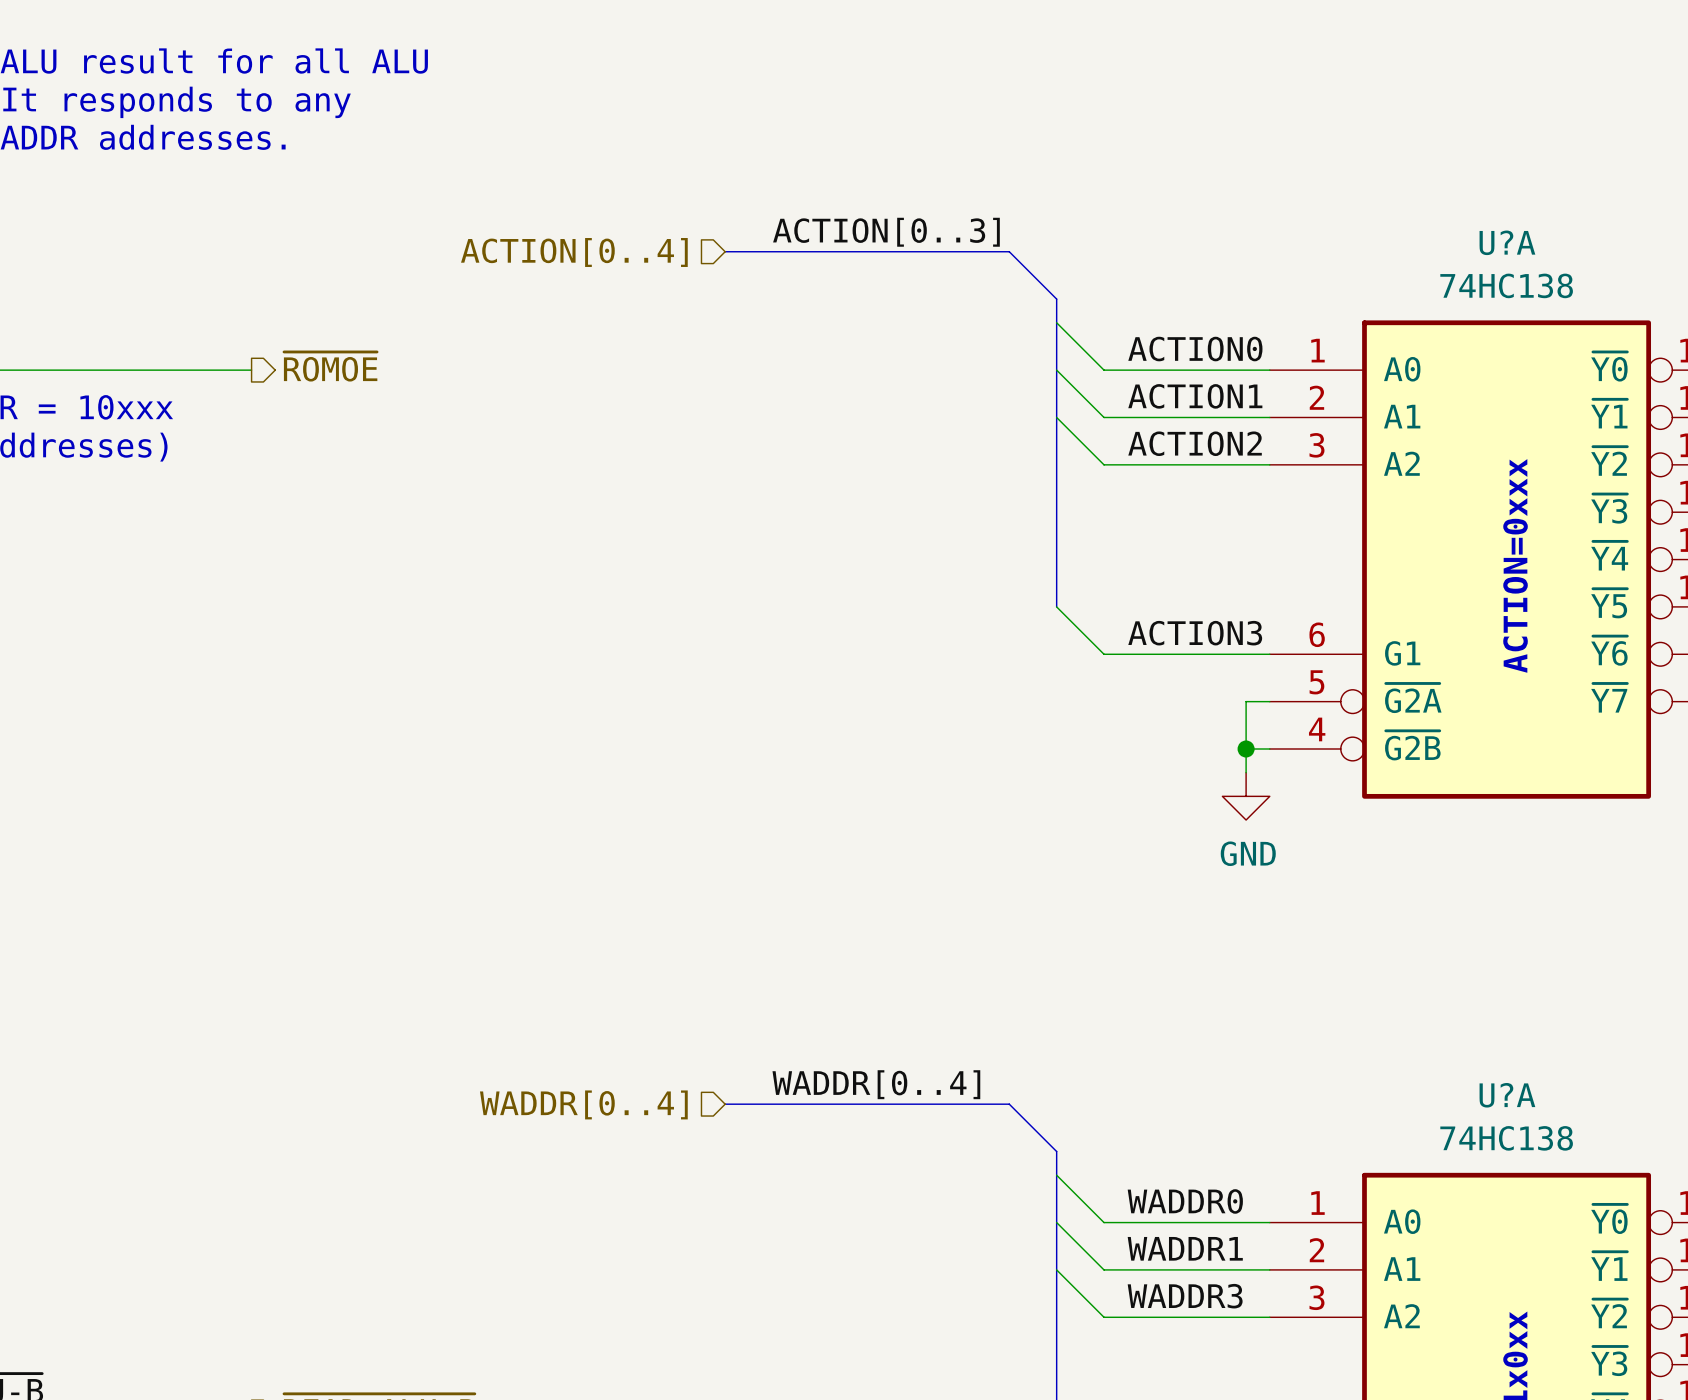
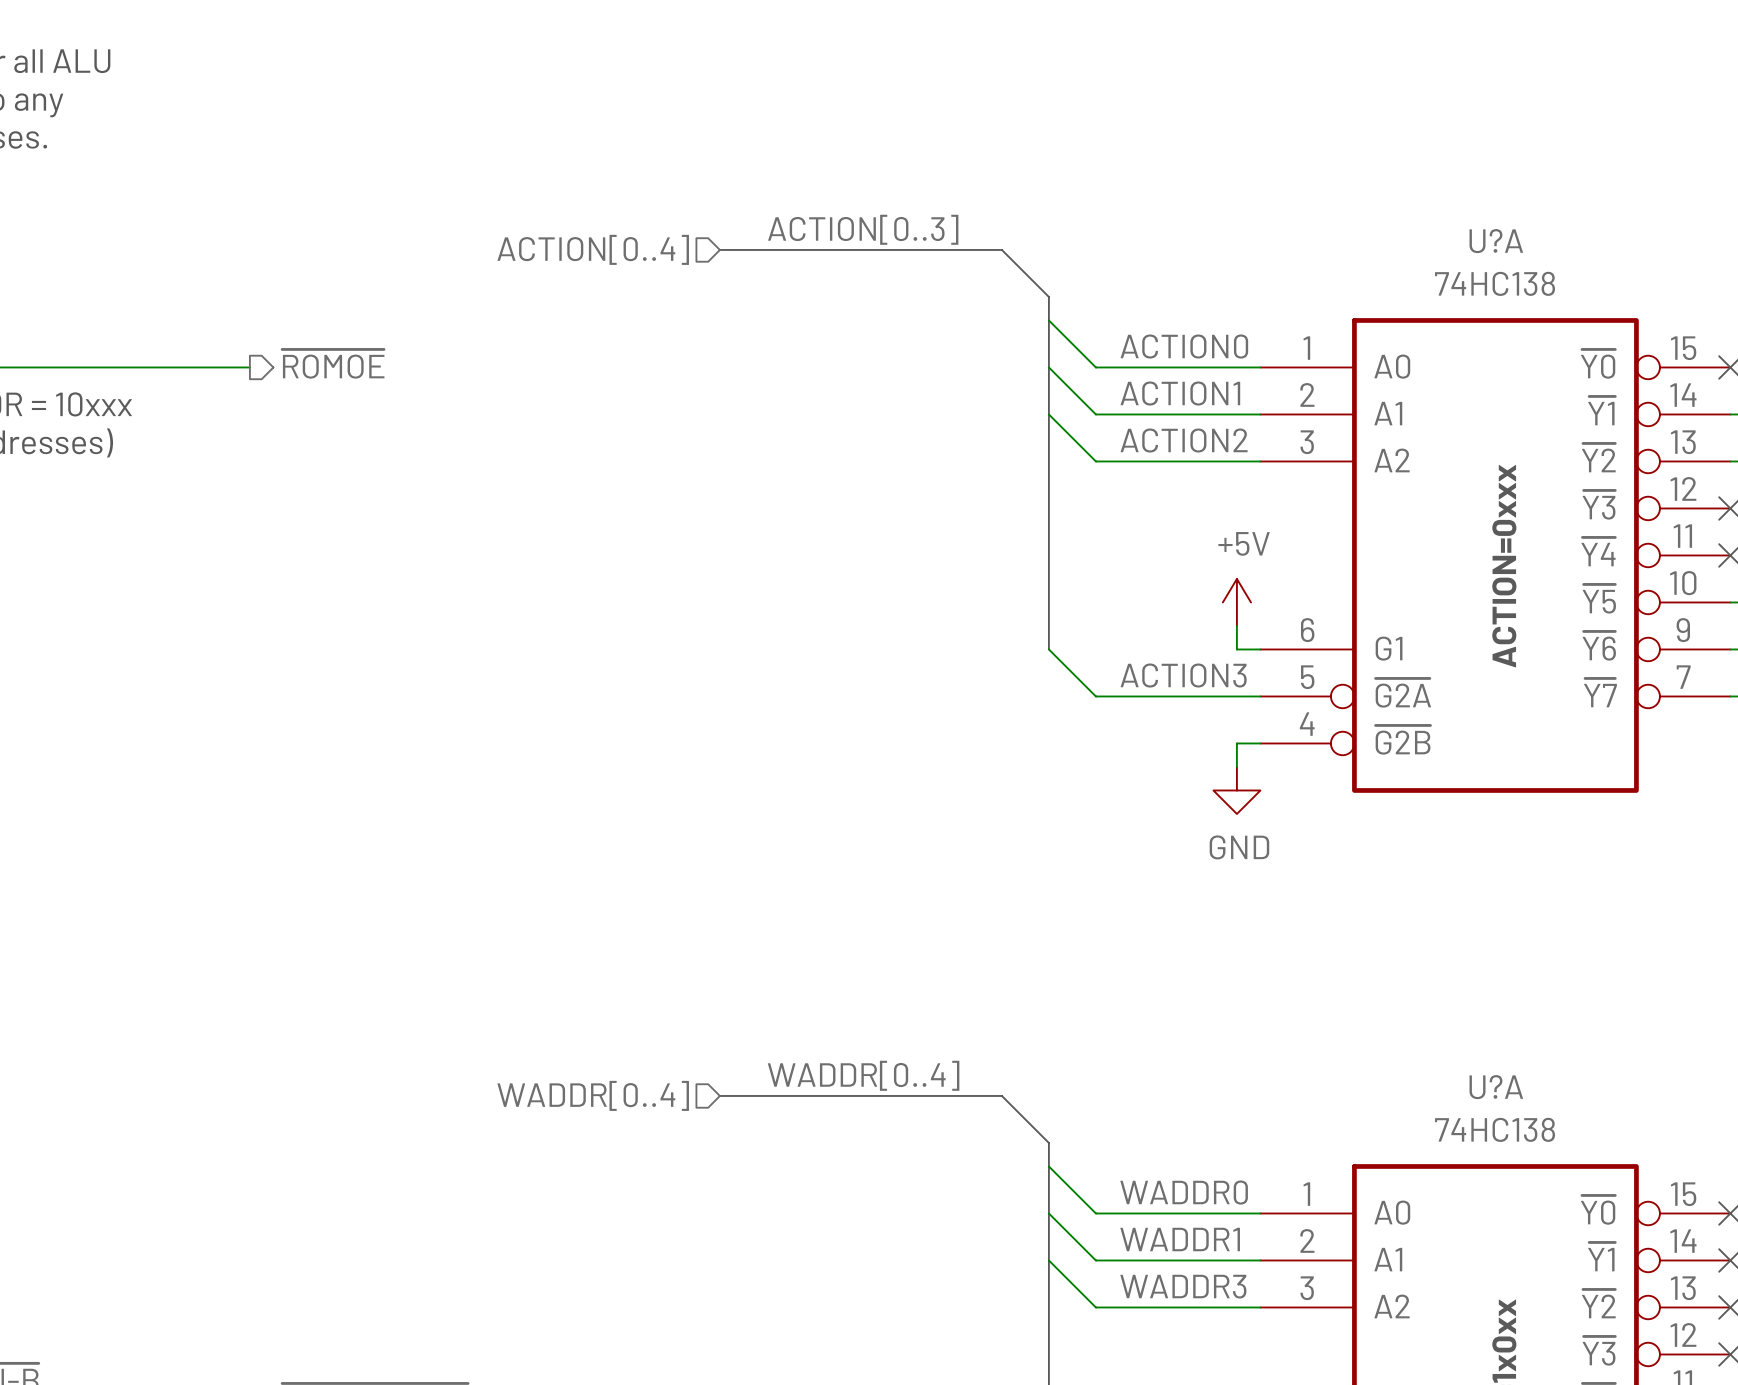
wire: (1056, 606) (1104, 654) (1246, 654) -> (1236, 625) (1236, 649)
bus: none -> (1048, 602) (1048, 649)
power symbol: none -> +5V (1236, 602)
label position: ACTION3 (1195, 633) -> ACTION3 (1183, 675)
wire: (1246, 701) (1246, 748) -> (1236, 696) (1095, 696) (1048, 649)
junction: (1246, 748) -> none

